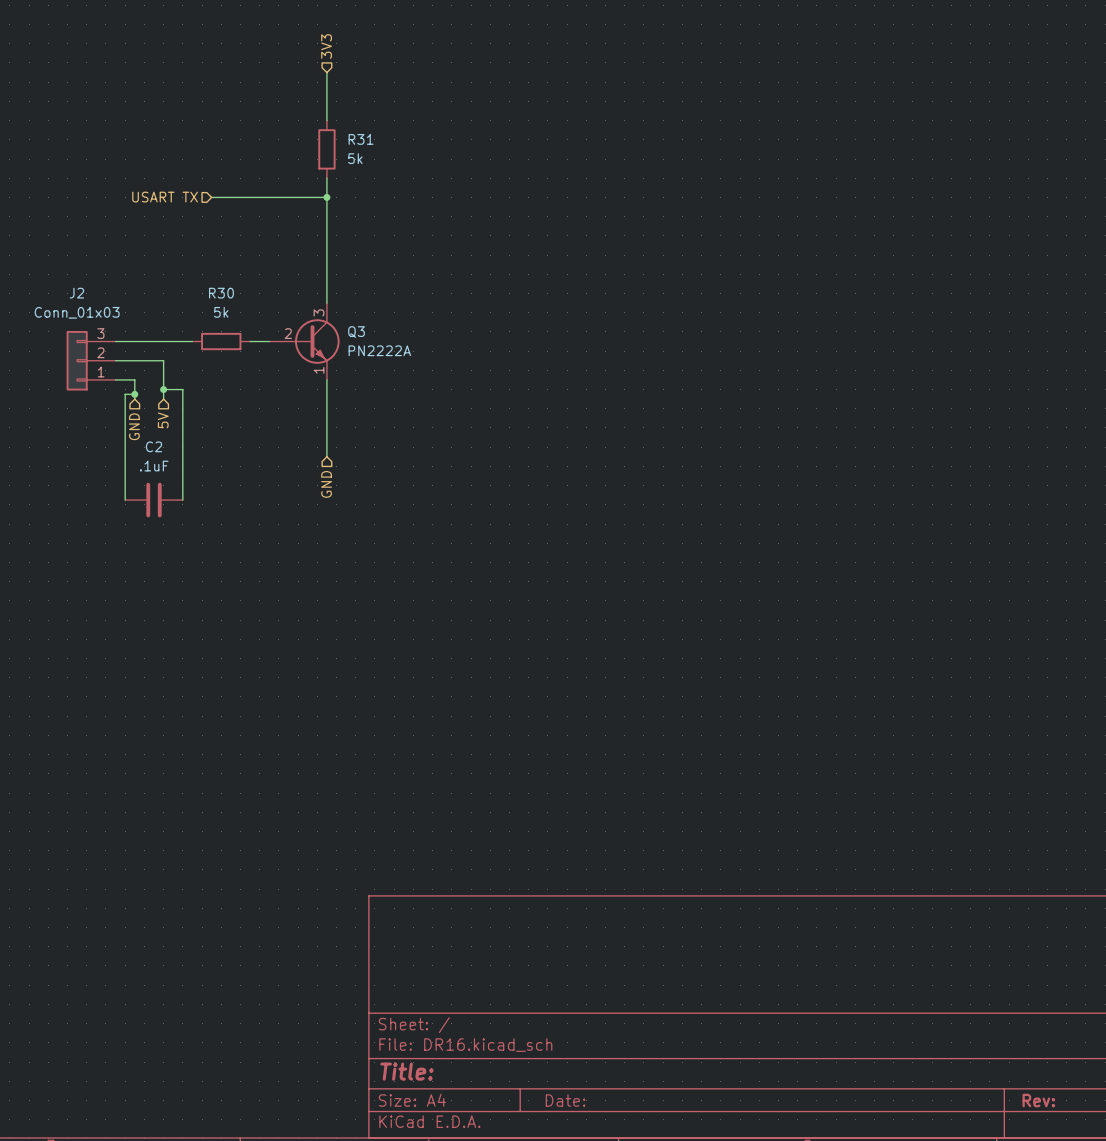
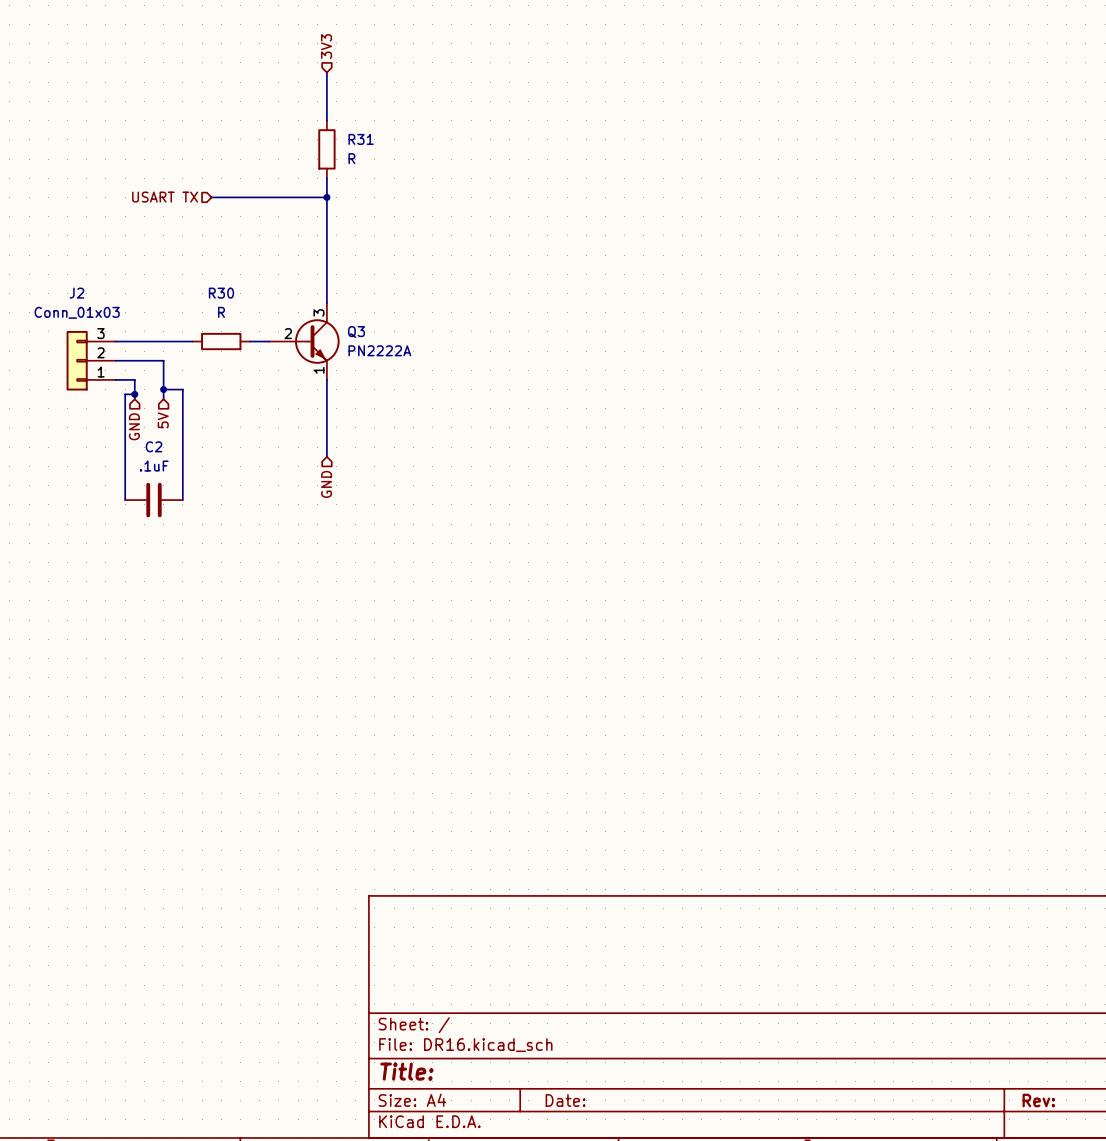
R31 value: 5k (355, 158) -> R (351, 158)
R30 value: 5k (221, 312) -> R (221, 312)

